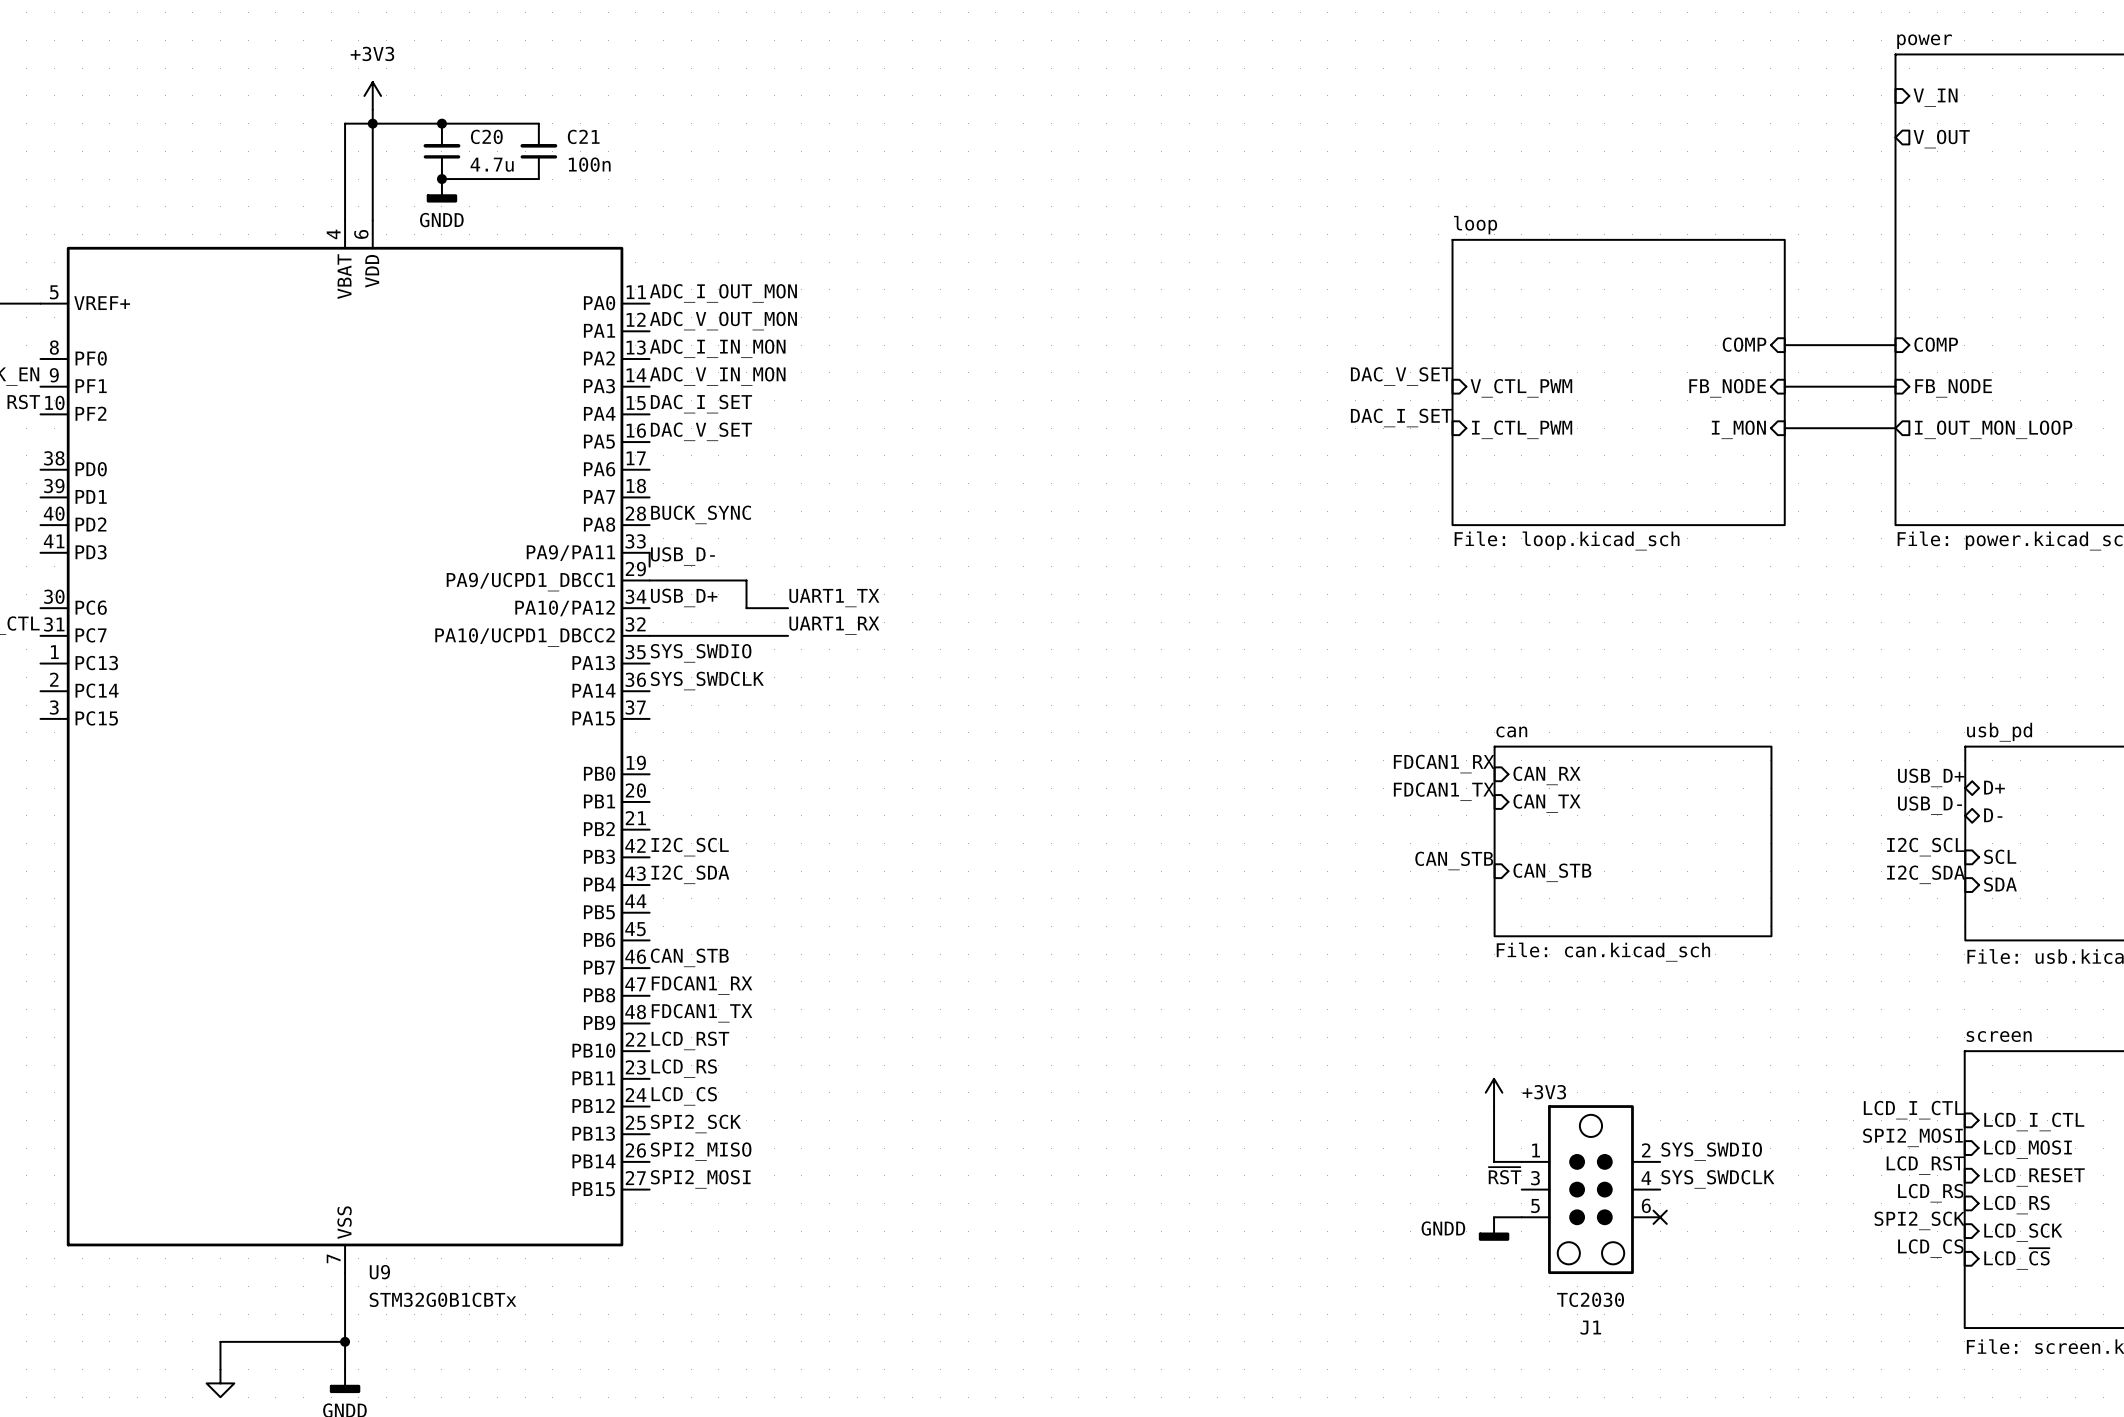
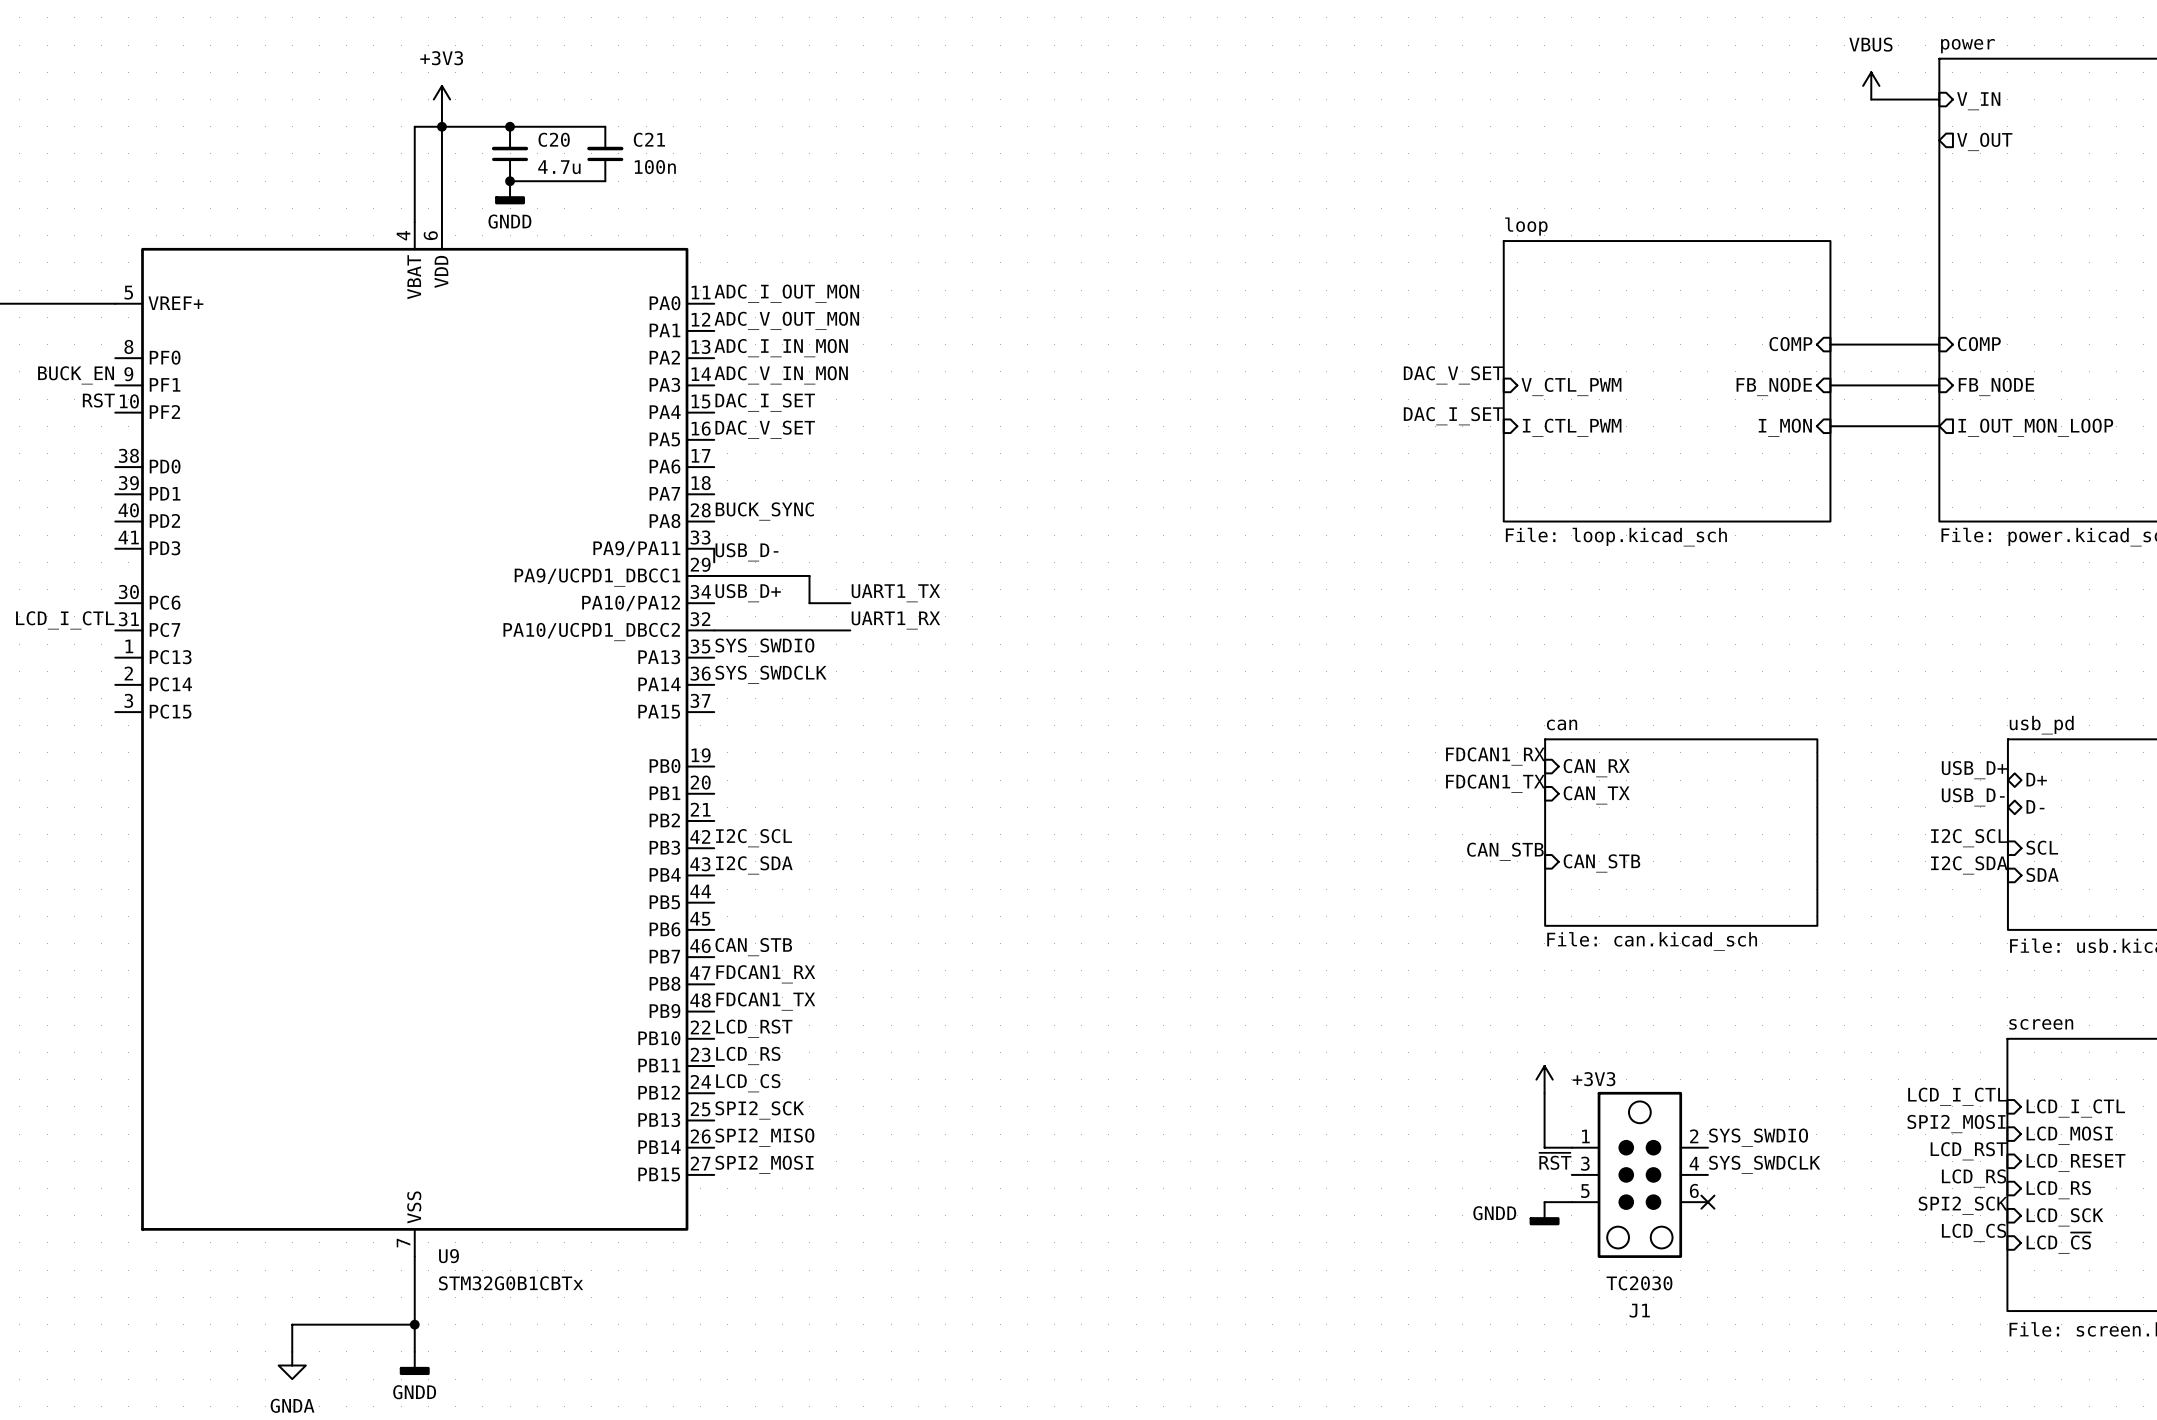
power symbol: none -> VBUS (1871, 85)
wire: none -> (1871, 99) (1939, 99)

